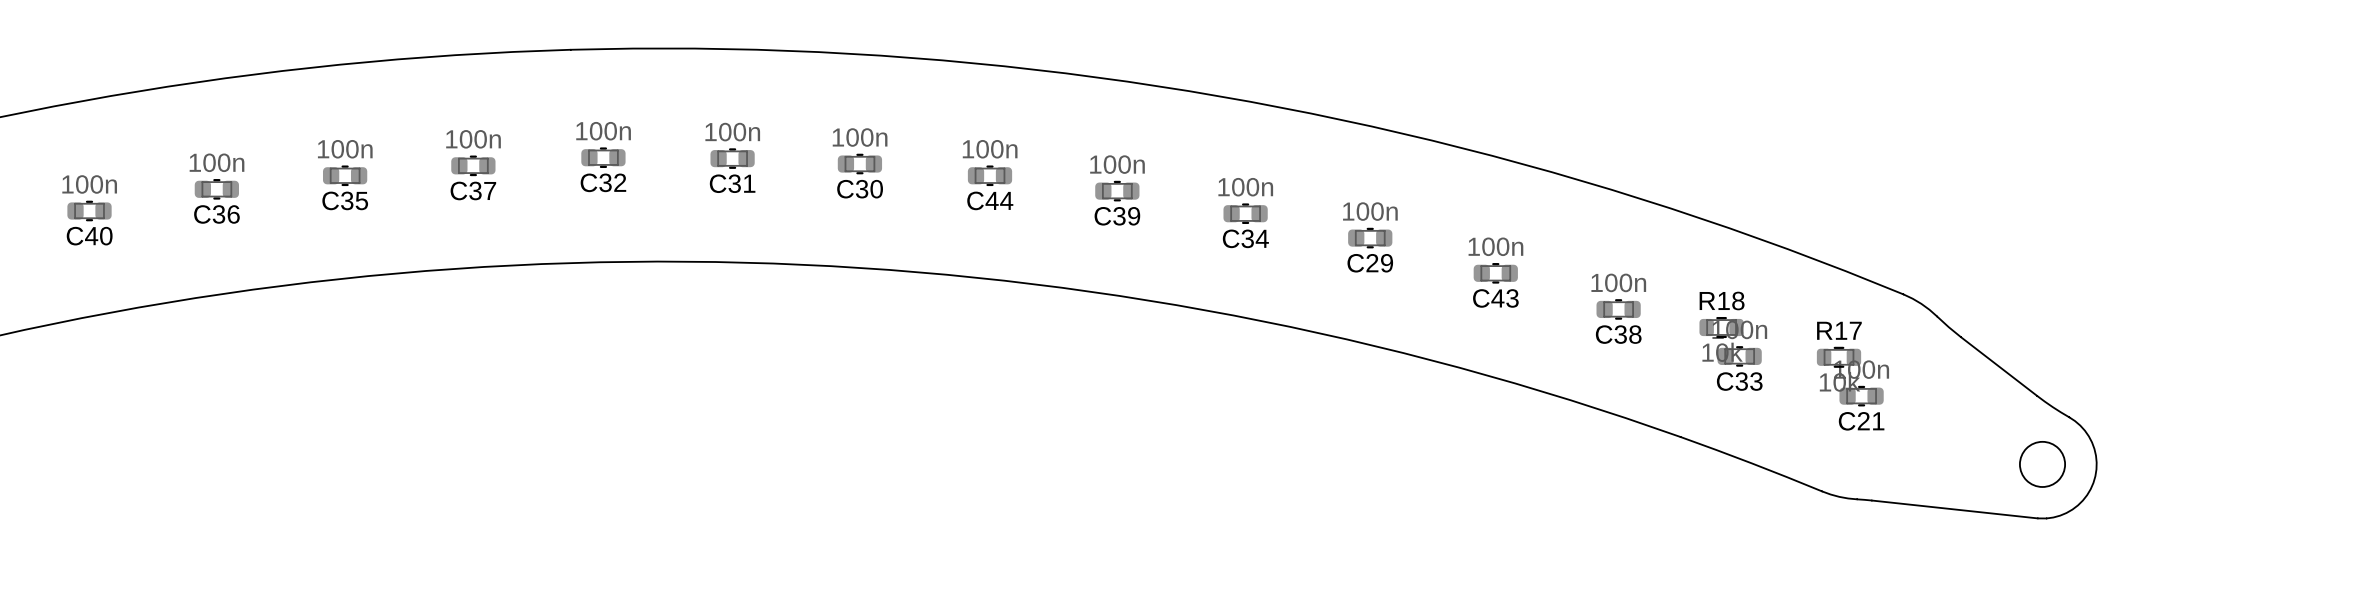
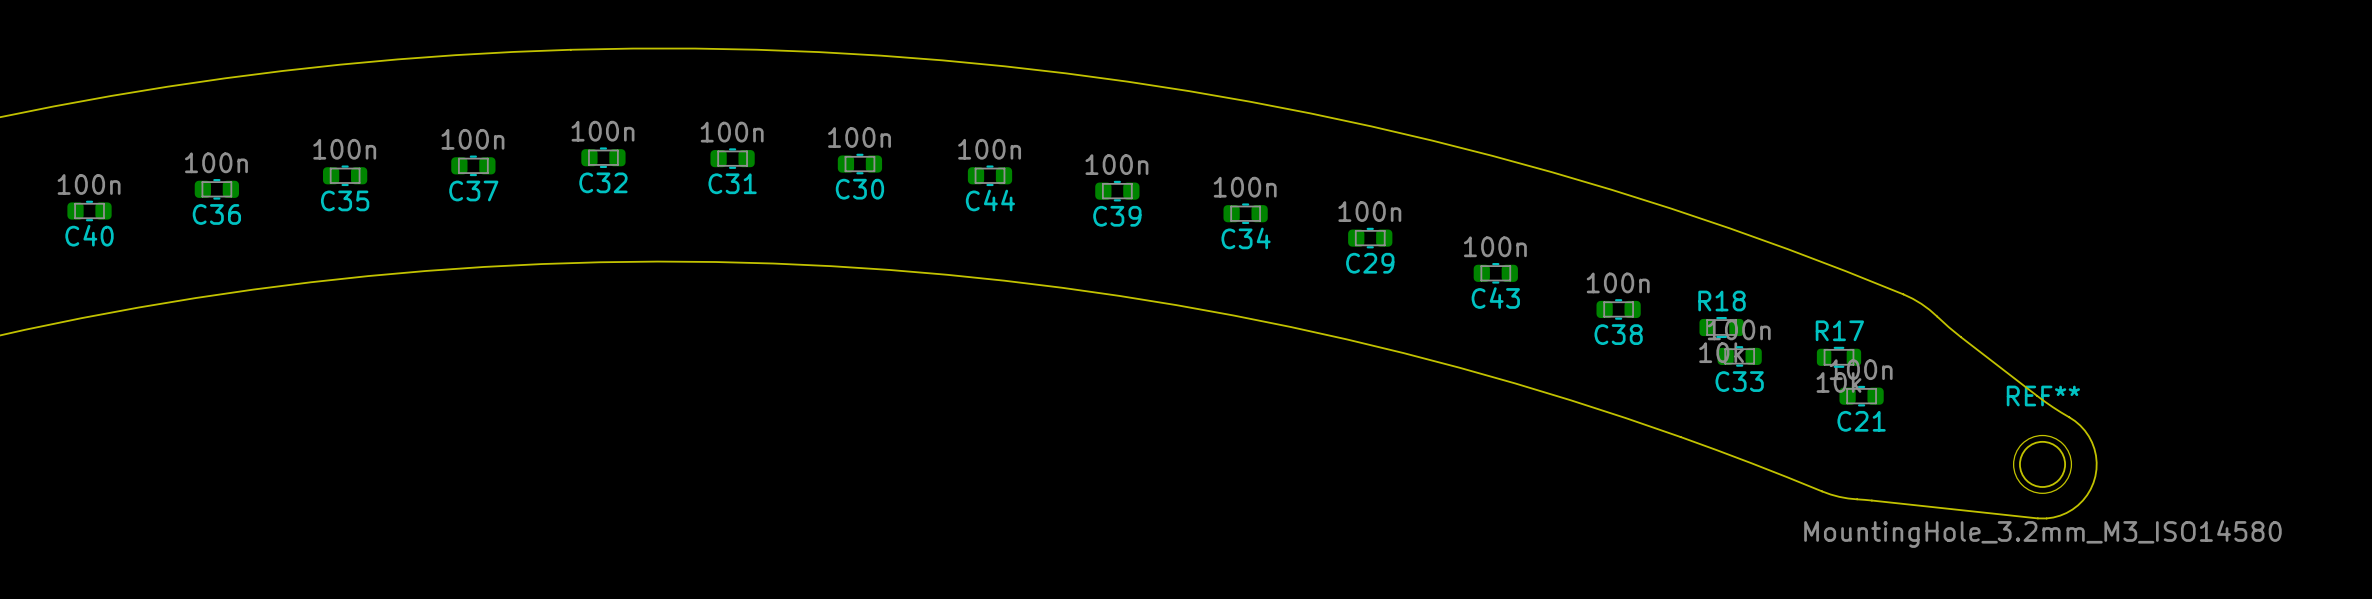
REF**: none -> MountingHole_3.2mm_M3_ISO14580 (2042, 464)

